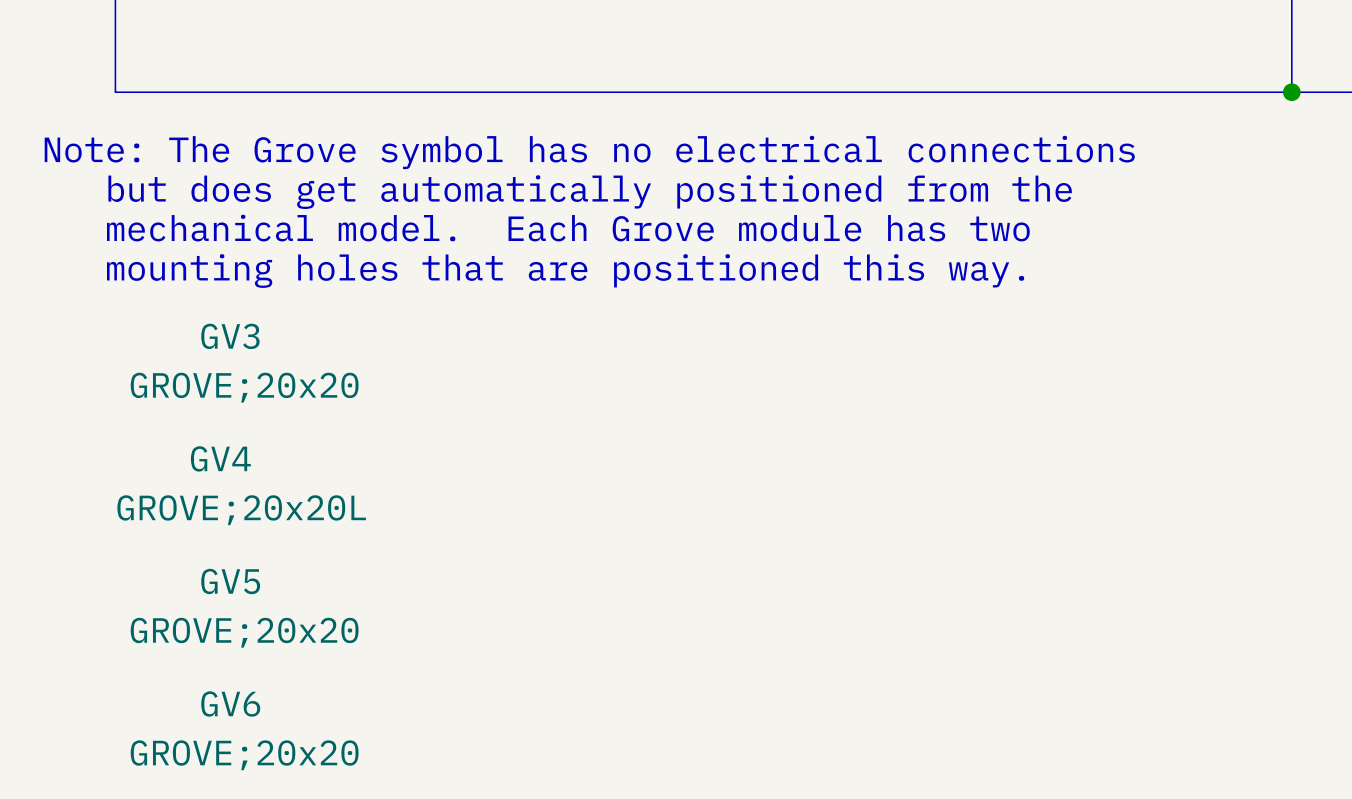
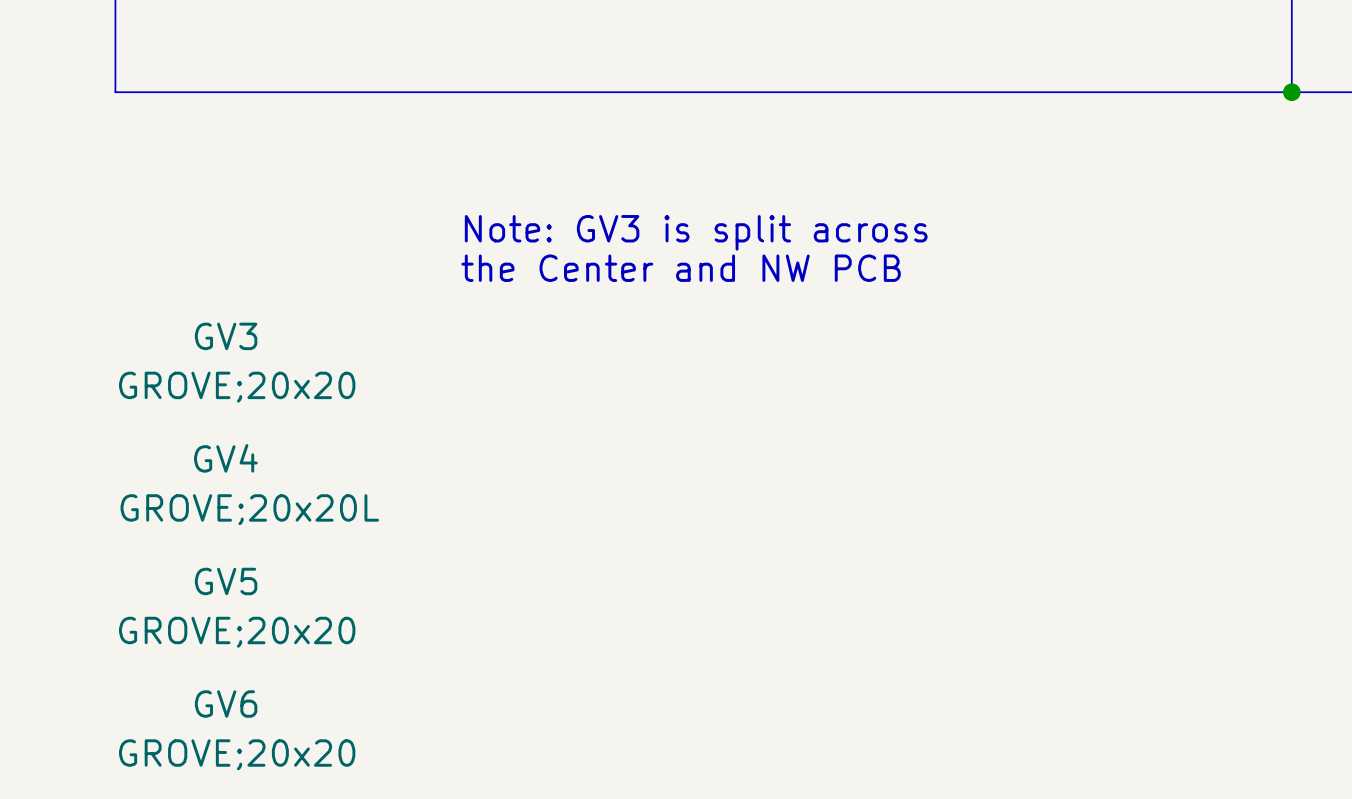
text: Note: The Grove symbol has no electrical connections (589, 152) -> none
text: but does get automatically positioned from the (590, 192) -> none
text: mechanical model. Each Grove module has two (568, 228) -> none
text: none -> Note: GV3 is split across (696, 232)
text: none -> the Center and NW PCB (681, 268)
text: mounting holes that are positioned this way. (565, 271) -> none

